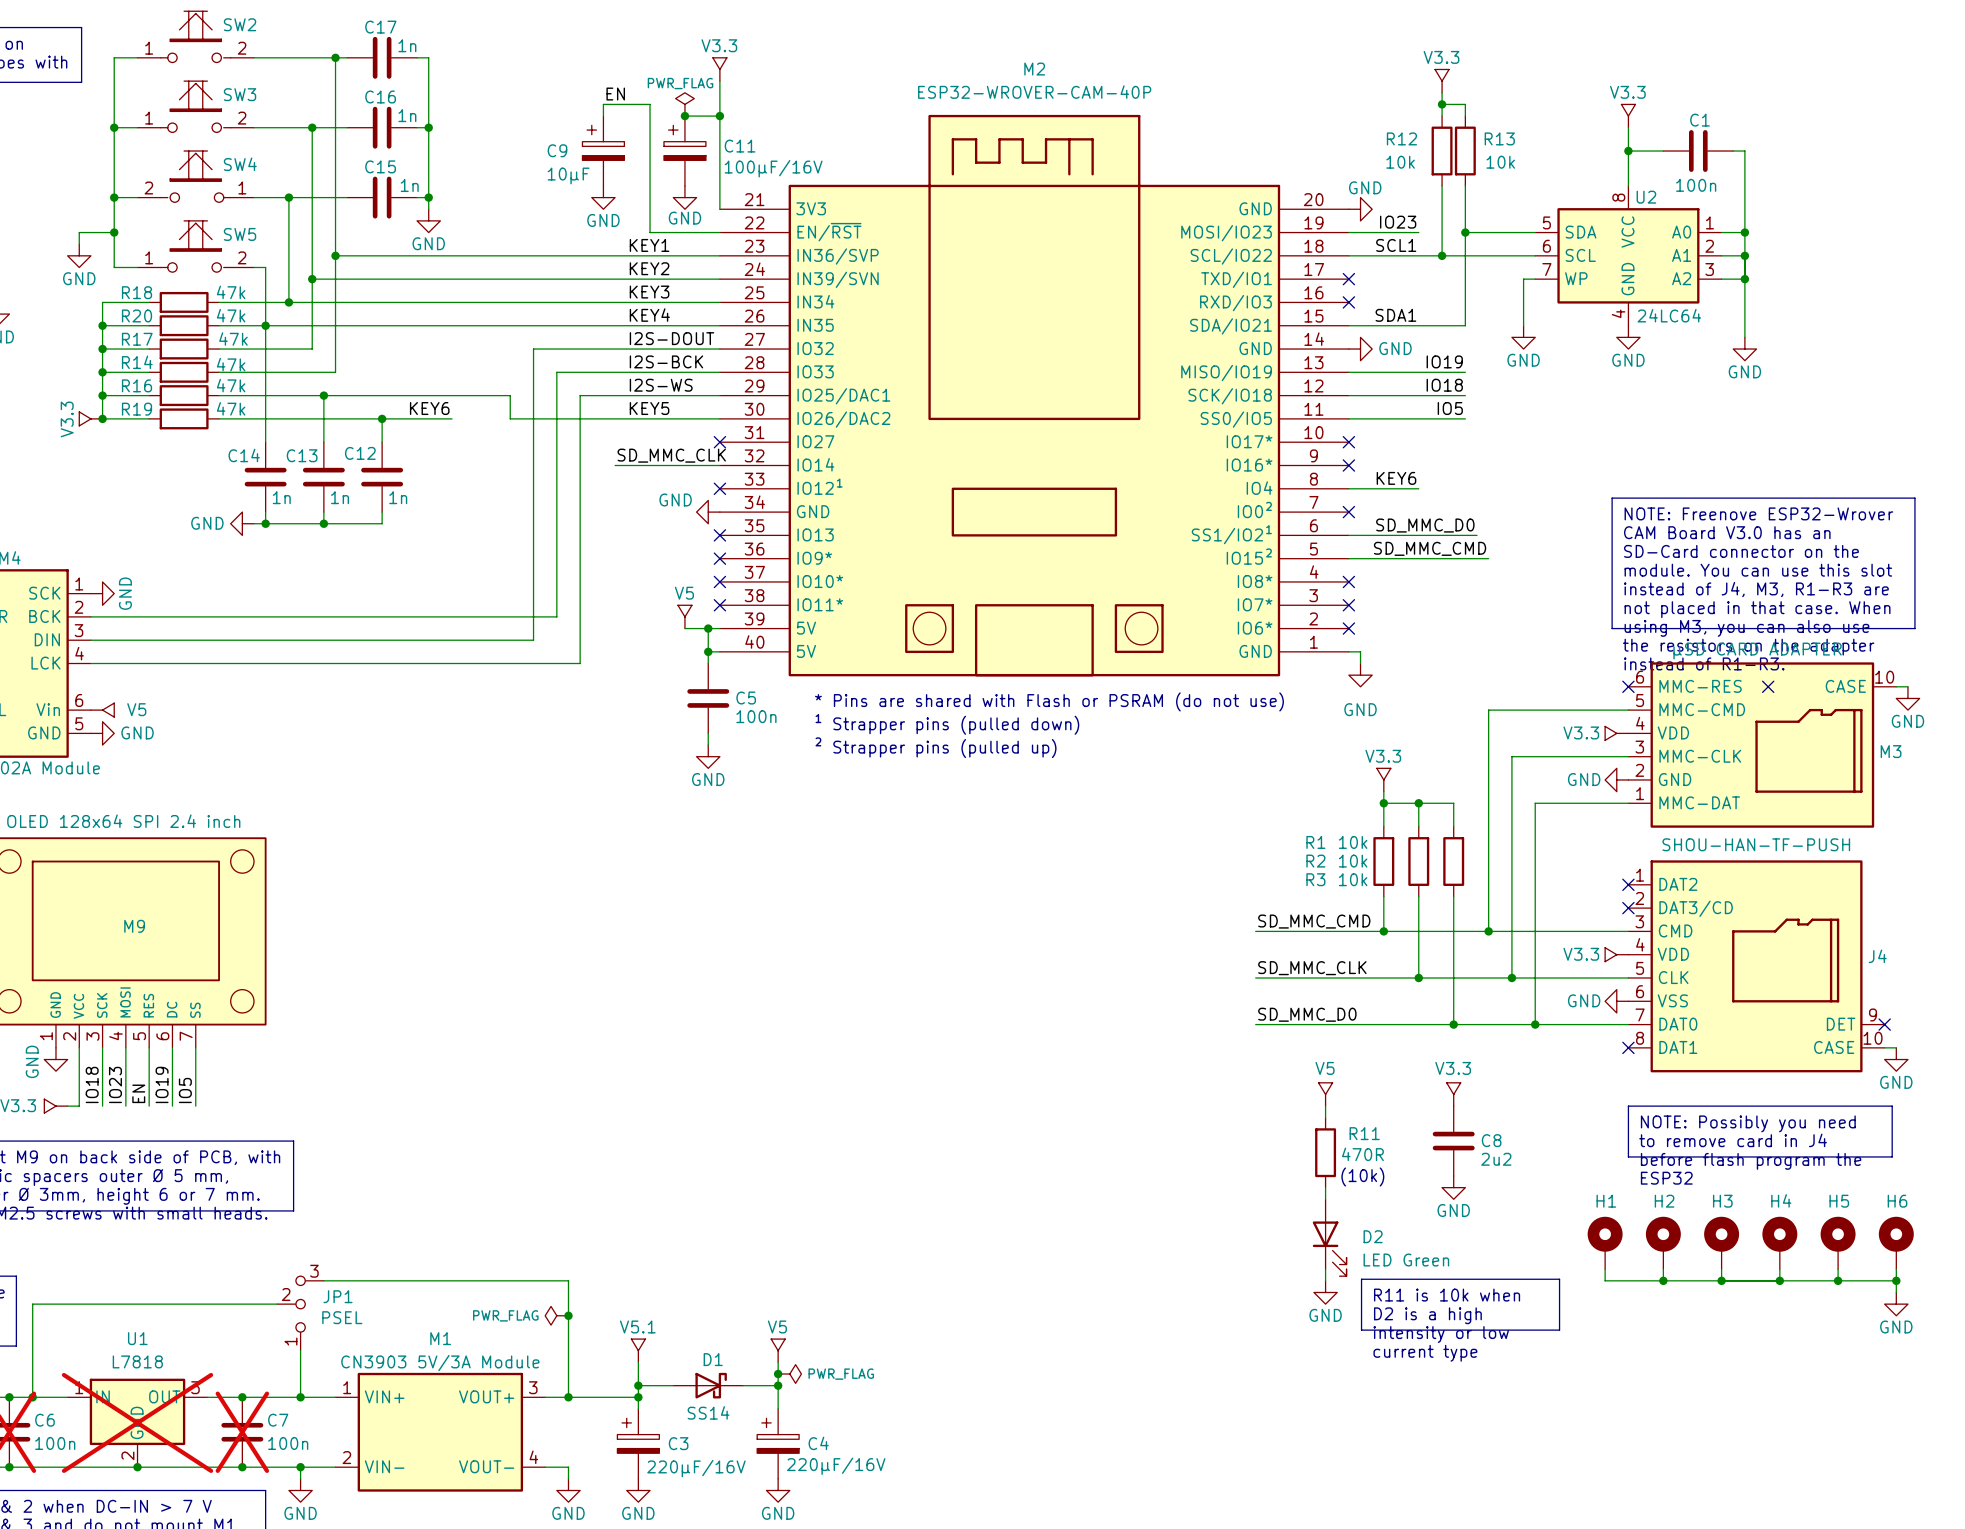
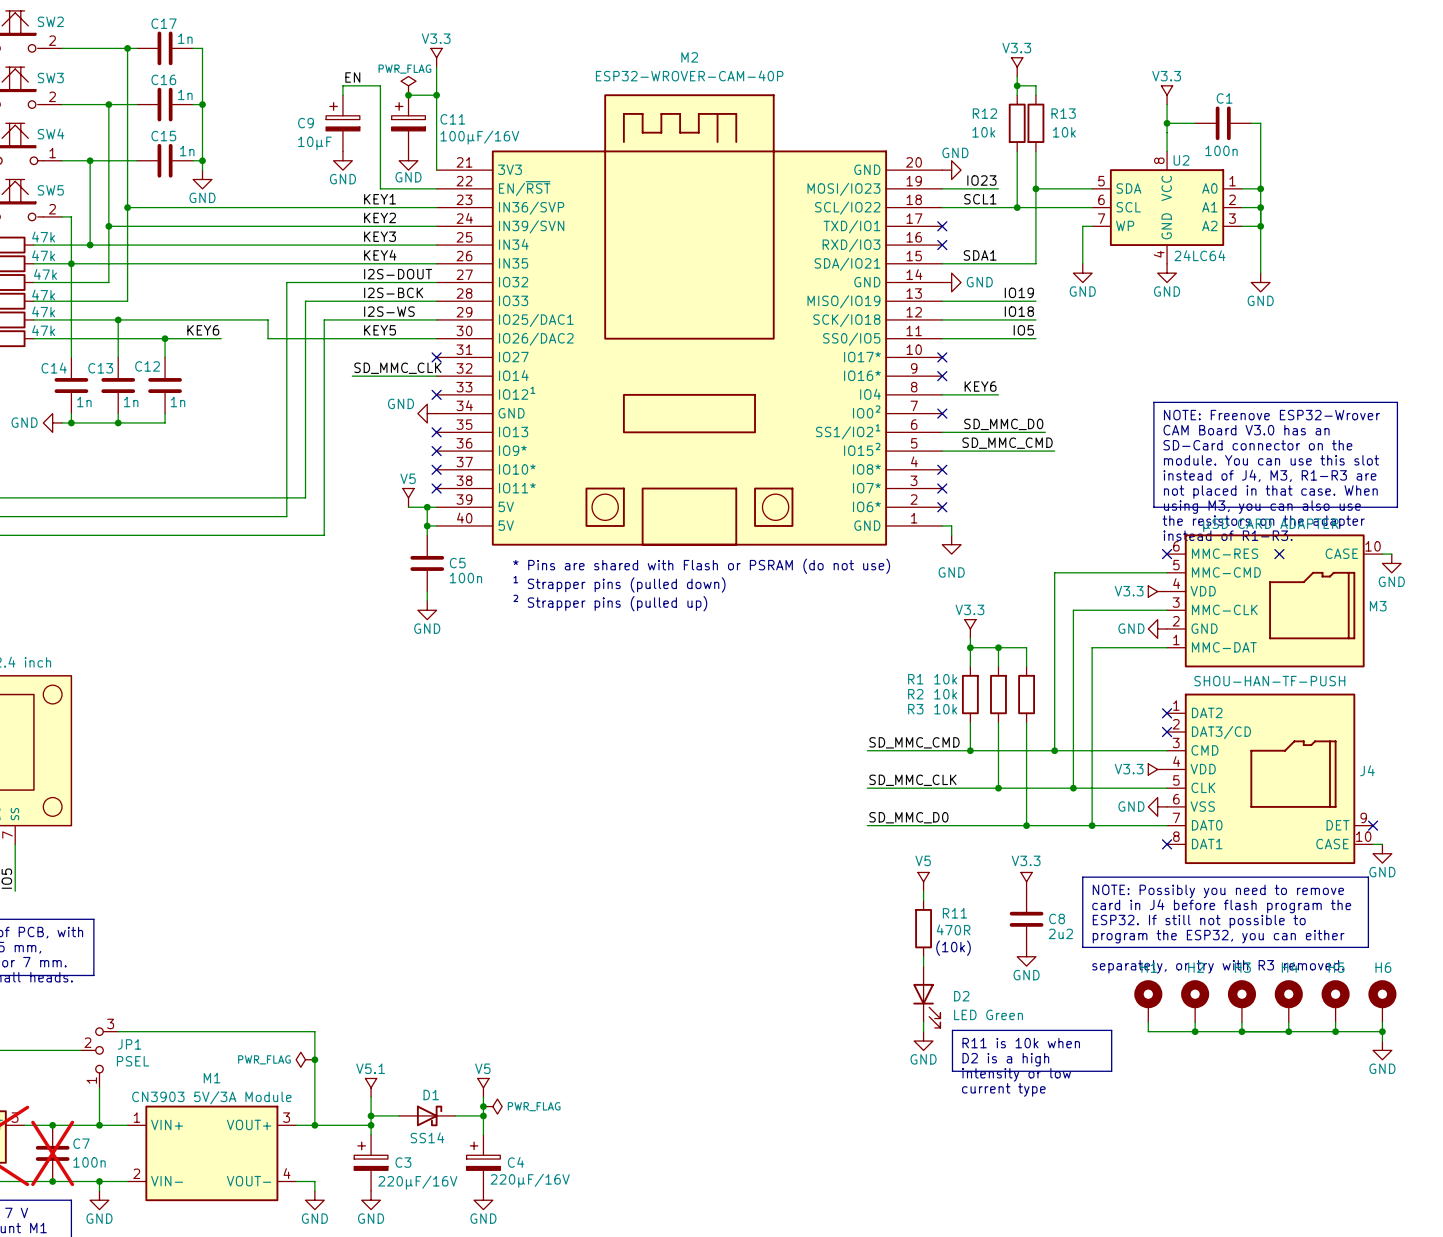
line: none -> (1082, 877) (1368, 877) (1368, 947) (1082, 947) (1082, 877)
line: (1628, 1106) (1892, 1106) (1892, 1156) (1628, 1156) (1628, 1106) -> none
text: NOTE: Possibly you need (1748, 1123) -> NOTE: Possibly you need to remove (1218, 891)
text: none -> card in J4 before flash program the (1221, 906)
text: to remove card in J4 (1733, 1140) -> none
text: none -> ESP32. If still not possible to (1199, 921)
text: before flash program the (1751, 1161) -> none
text: none -> program the ESP32, you can either (1218, 936)
text: ESP32 (1666, 1178) -> none
text: none -> separately, or try with R3 removed. (1218, 966)

